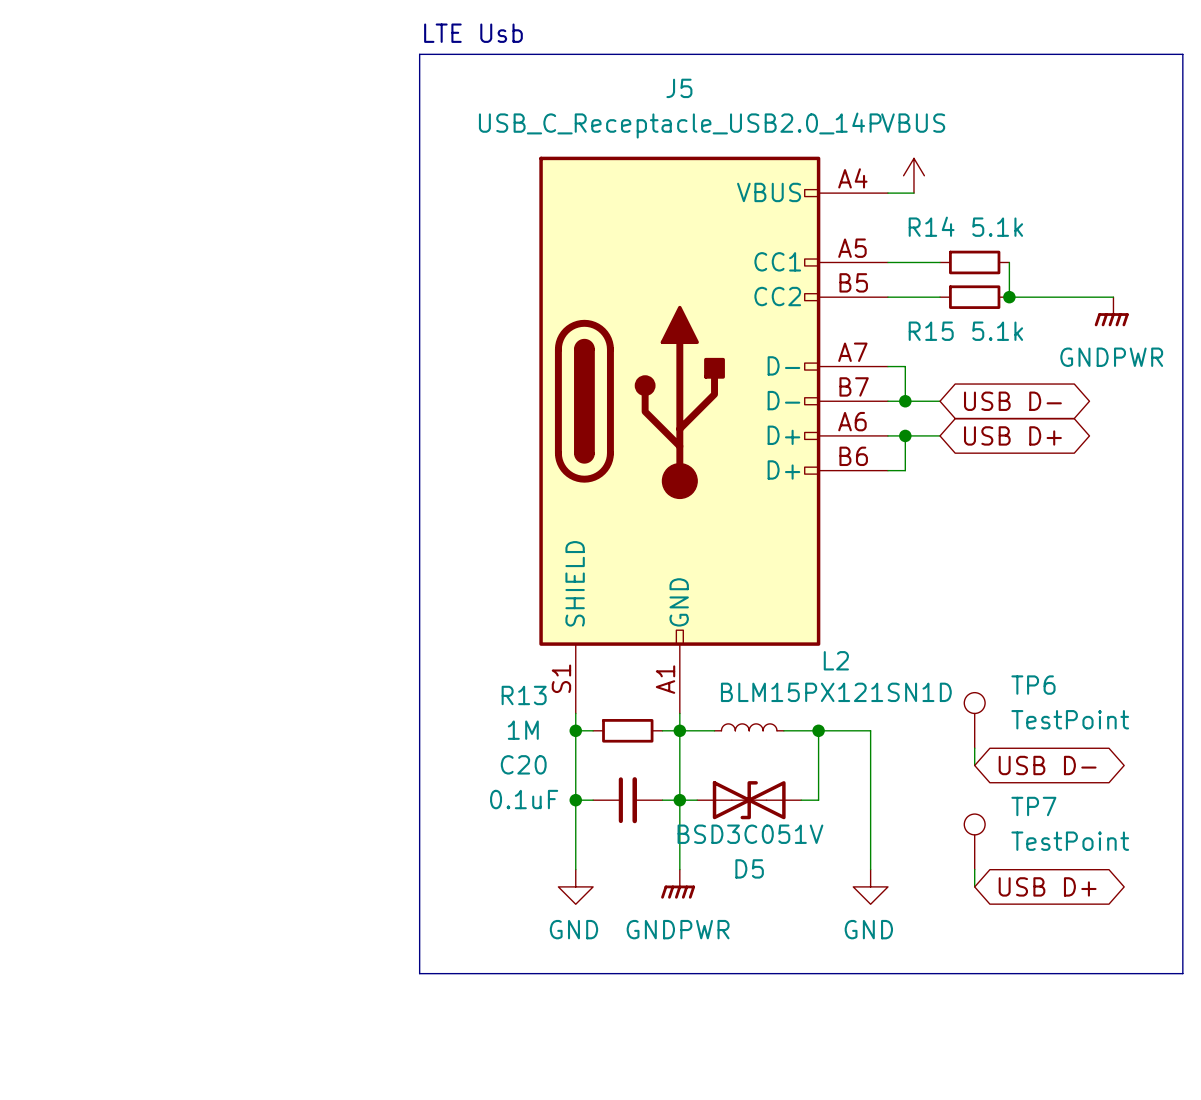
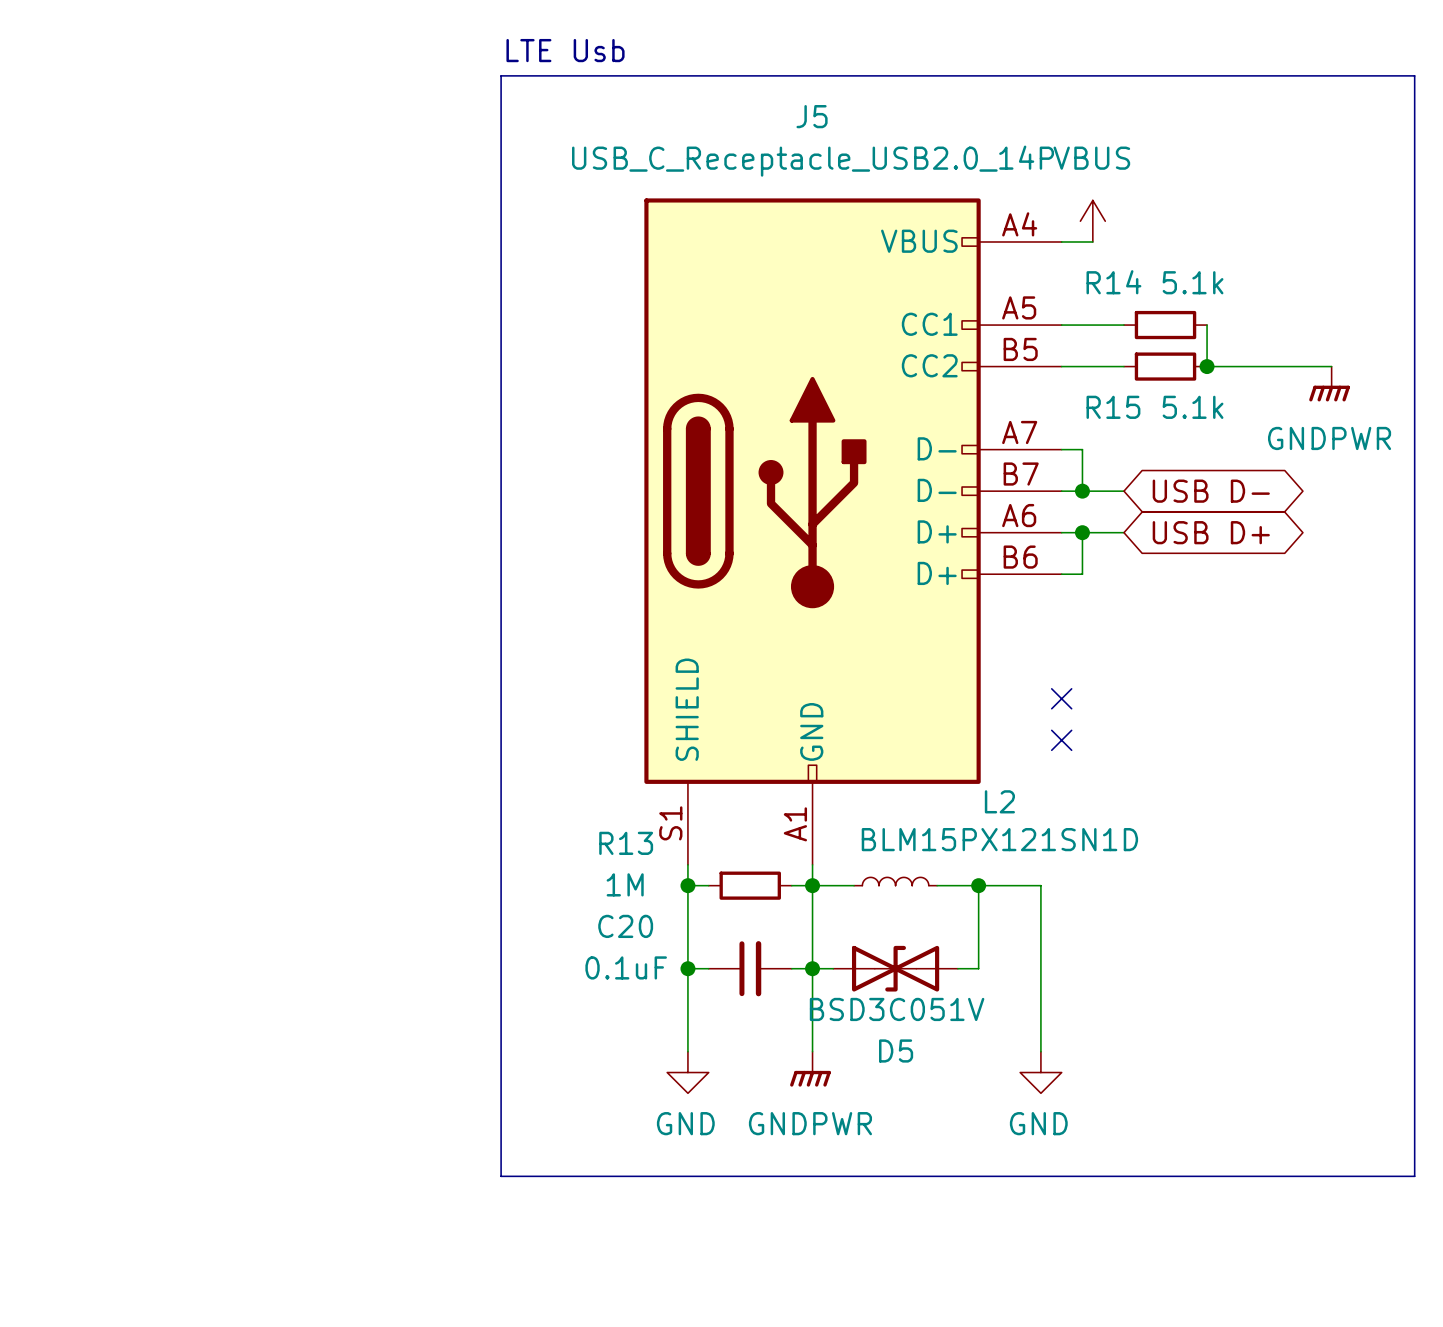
no-connect mark: none -> (1061, 698)
no-connect mark: none -> (1061, 740)
TP6: TestPoint (974, 720) -> none
wire: (974, 748) (974, 765) -> none
global label: USB D- (1047, 765) -> none
TP7: TestPoint (974, 841) -> none
wire: (974, 869) (974, 886) -> none
global label: USB D+ (1047, 886) -> none

